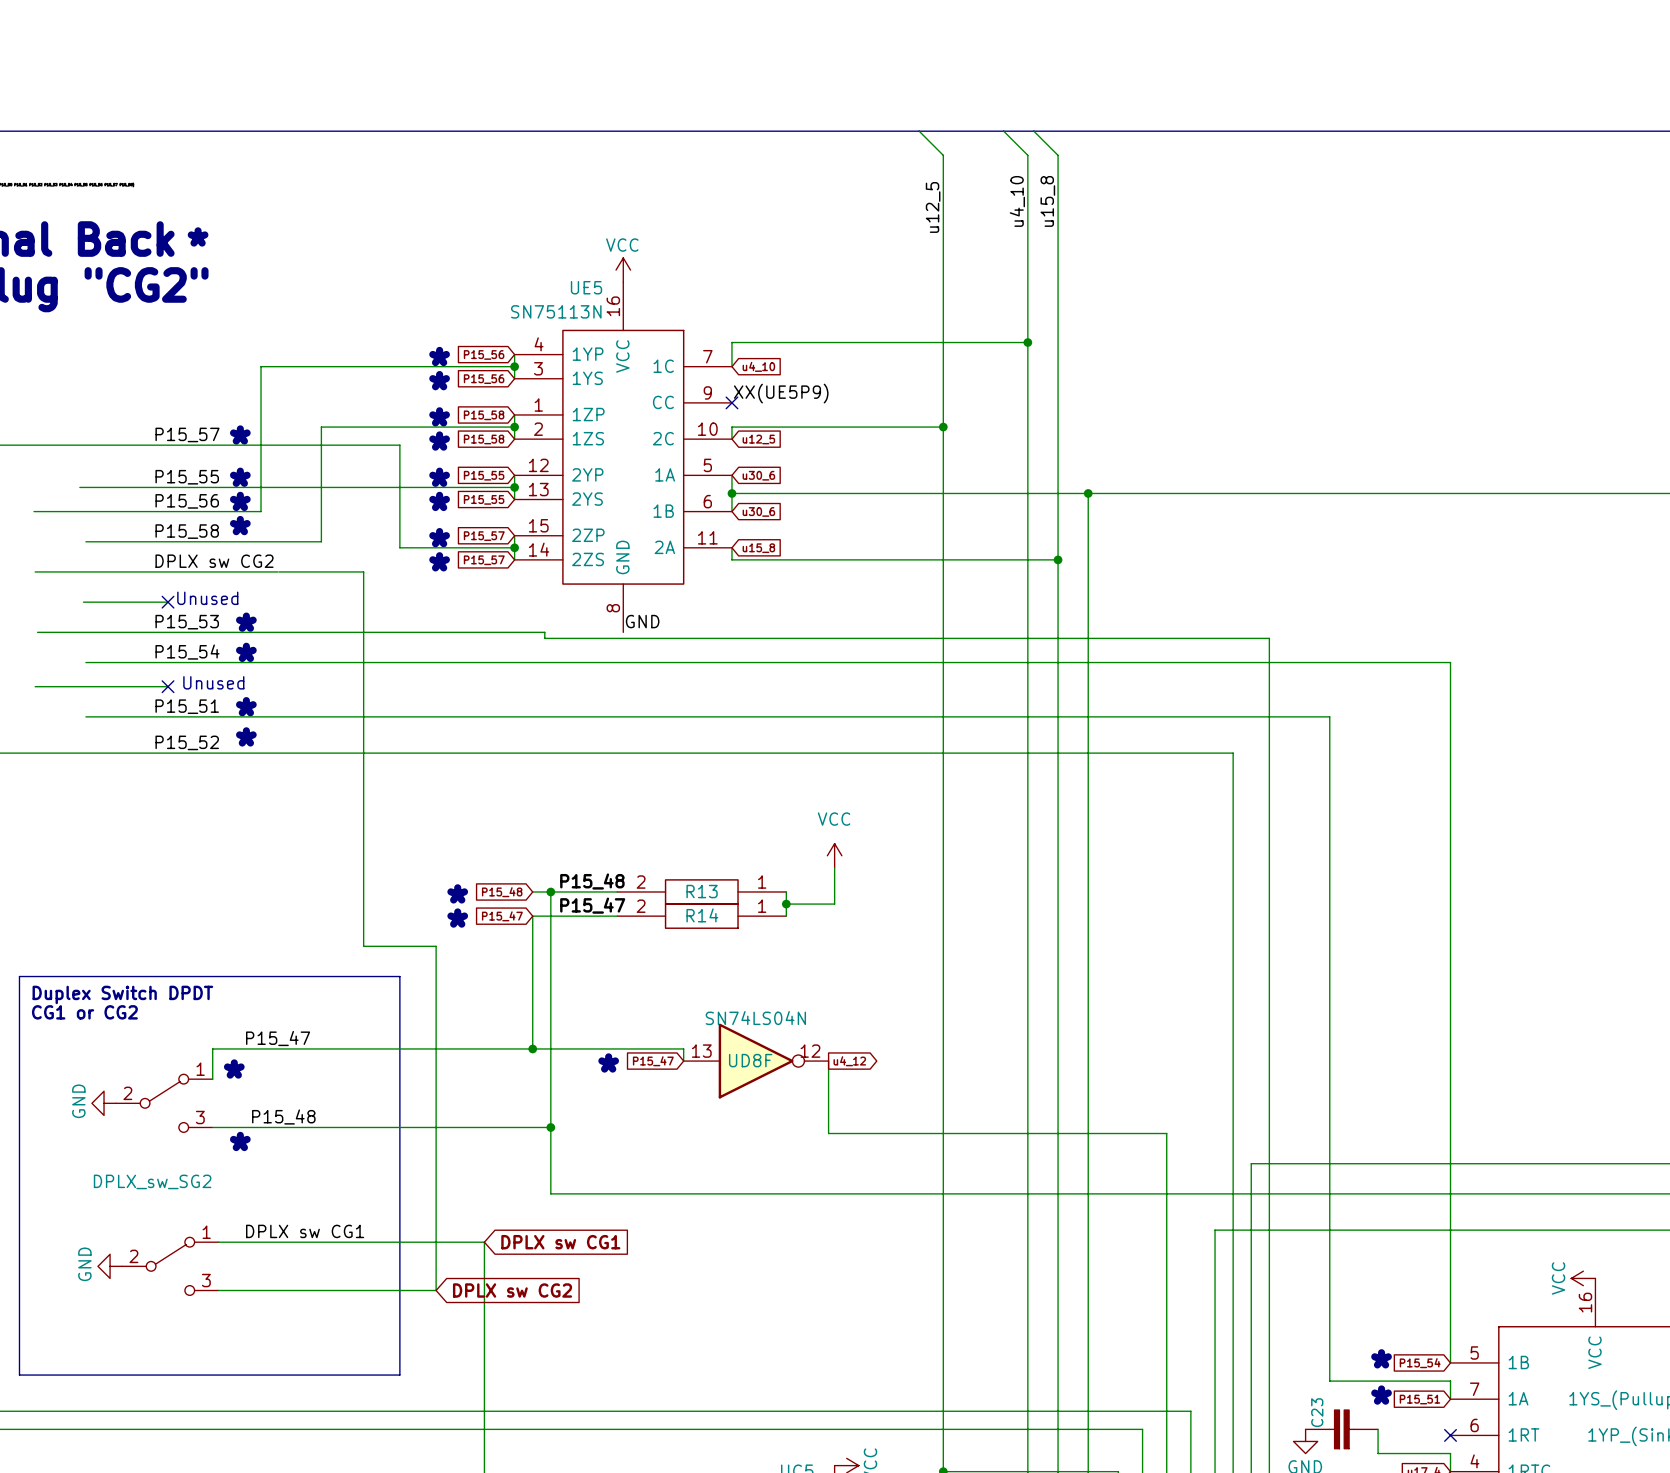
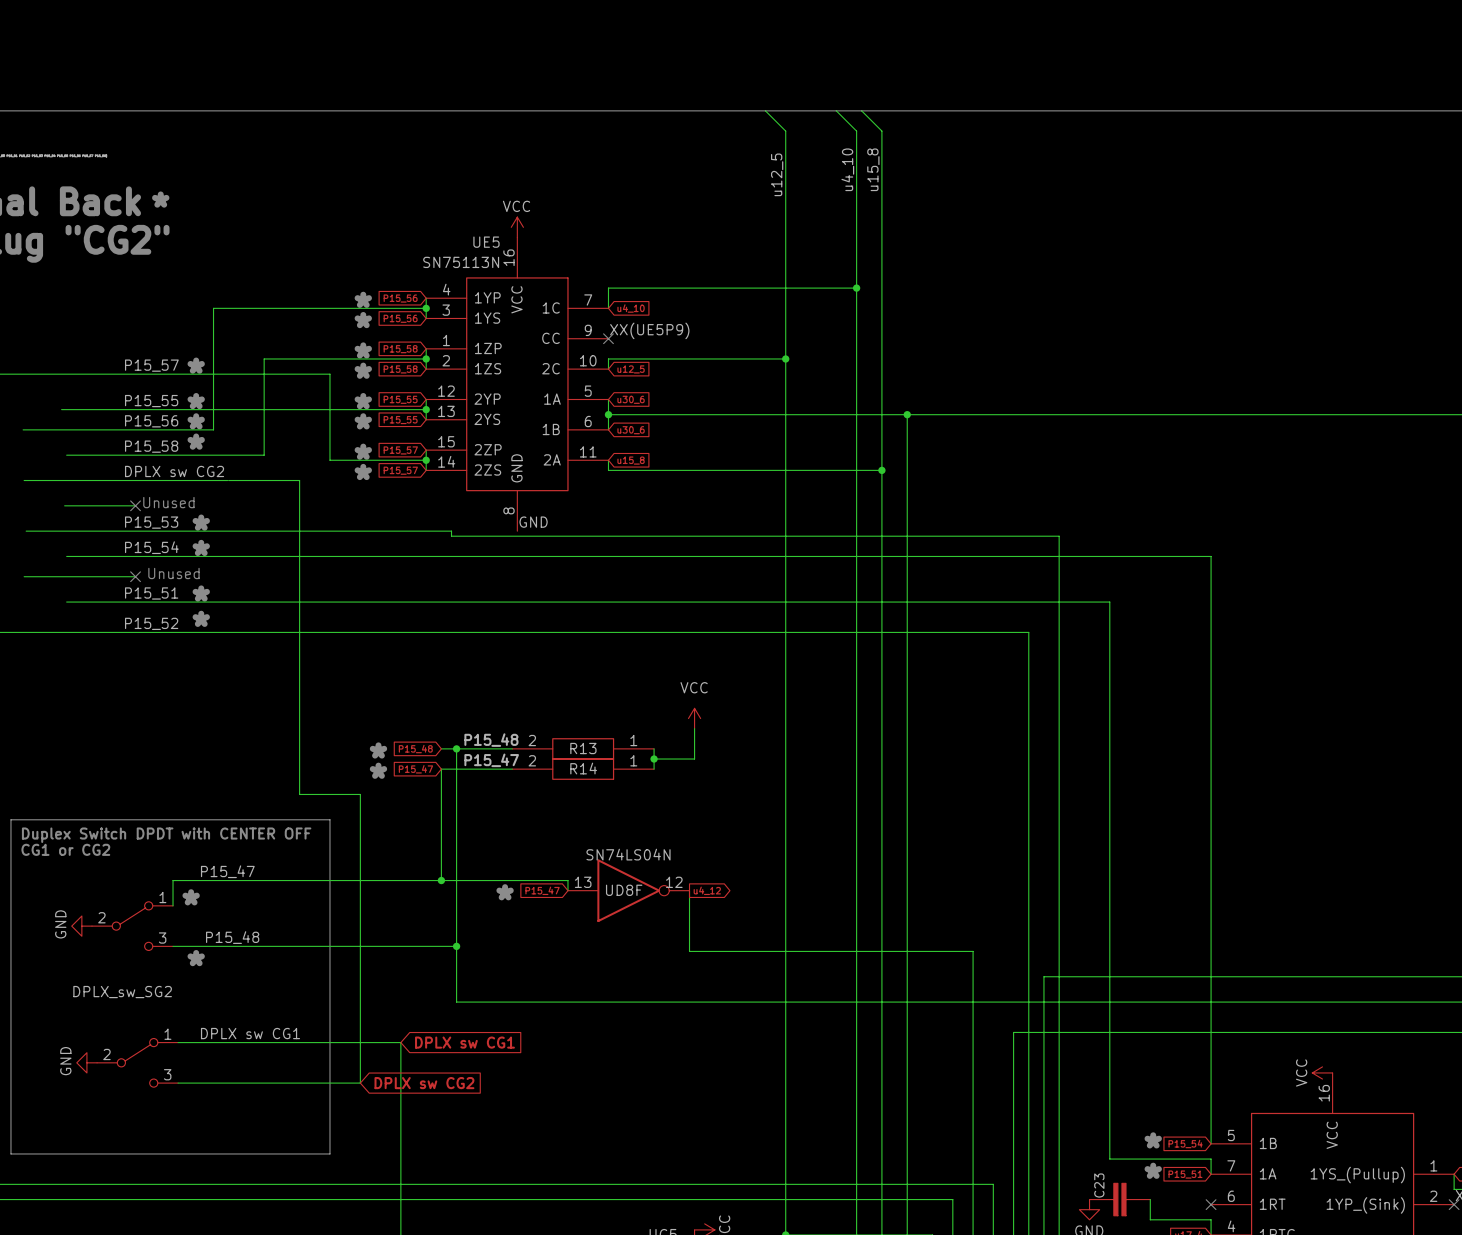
text: Duplex Switch DPDT (122, 994) -> Duplex Switch DPDT with CENTER OFF (166, 835)

